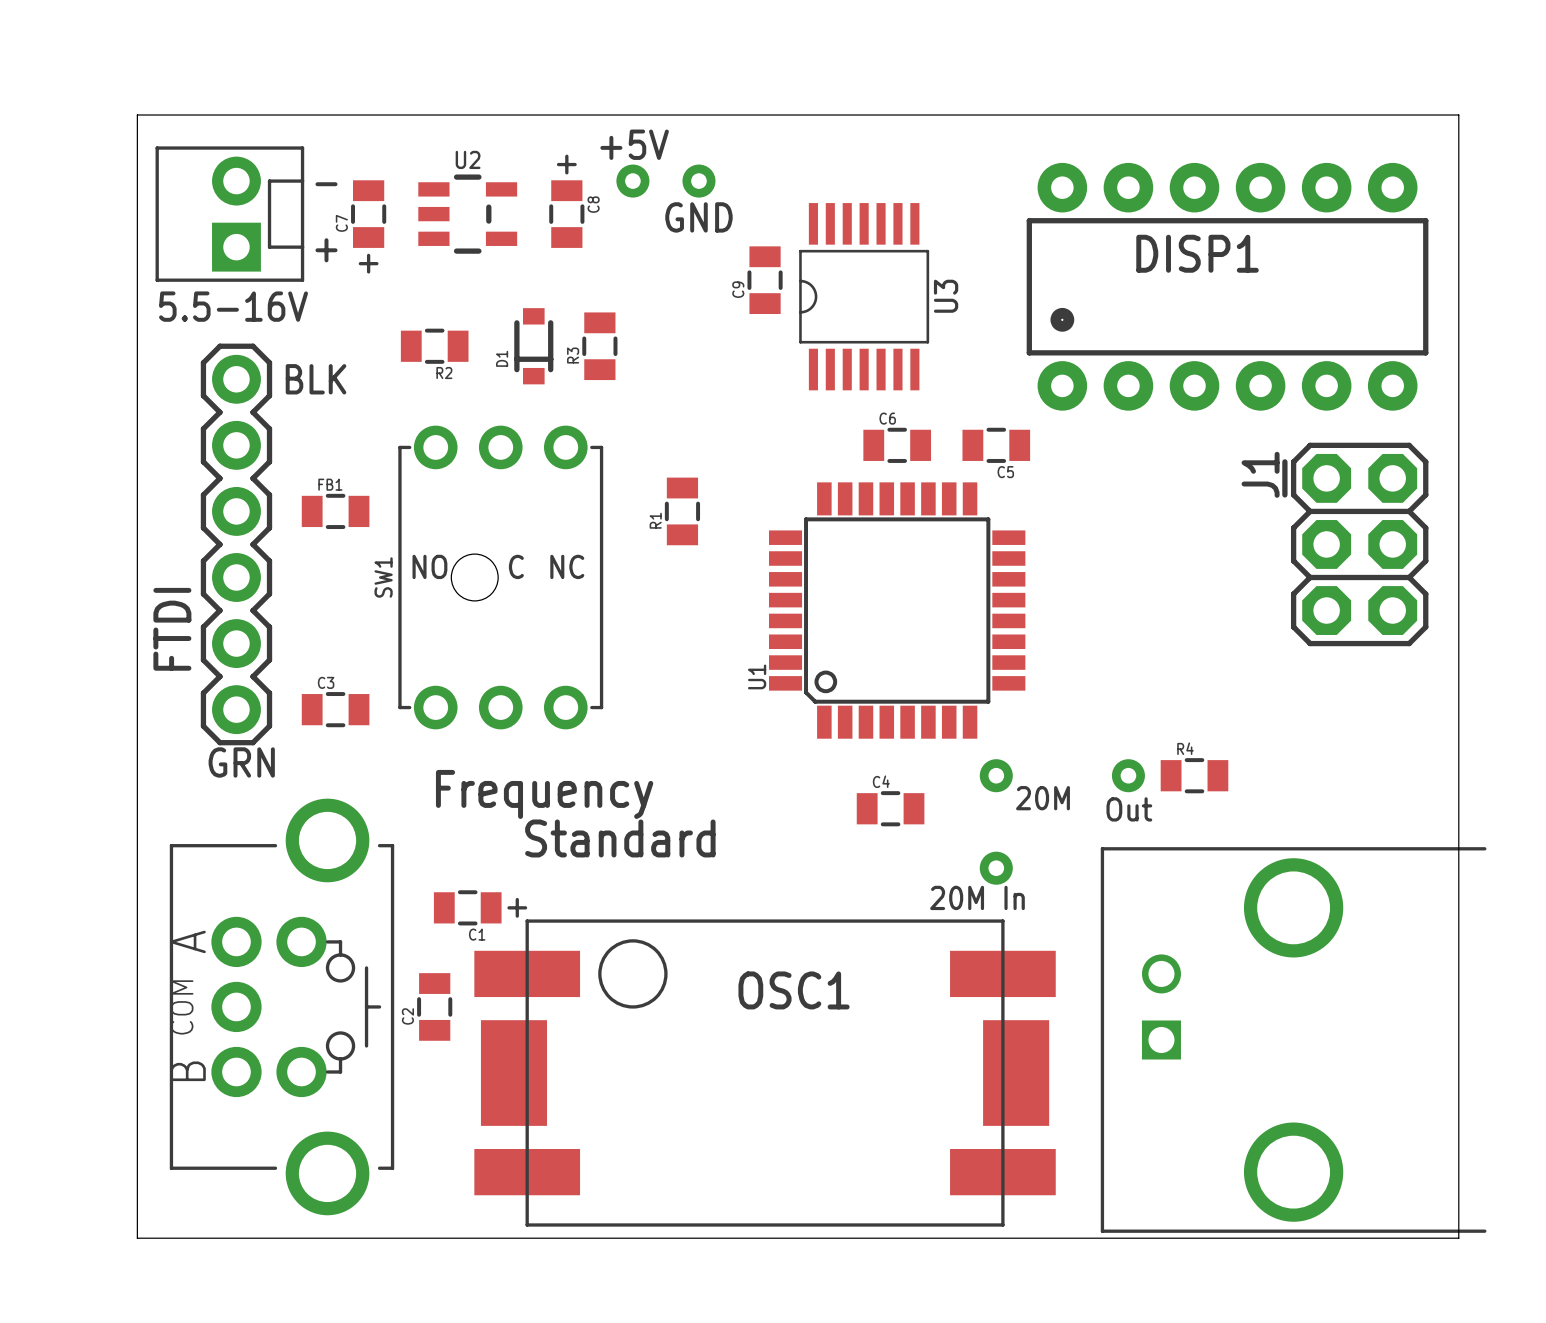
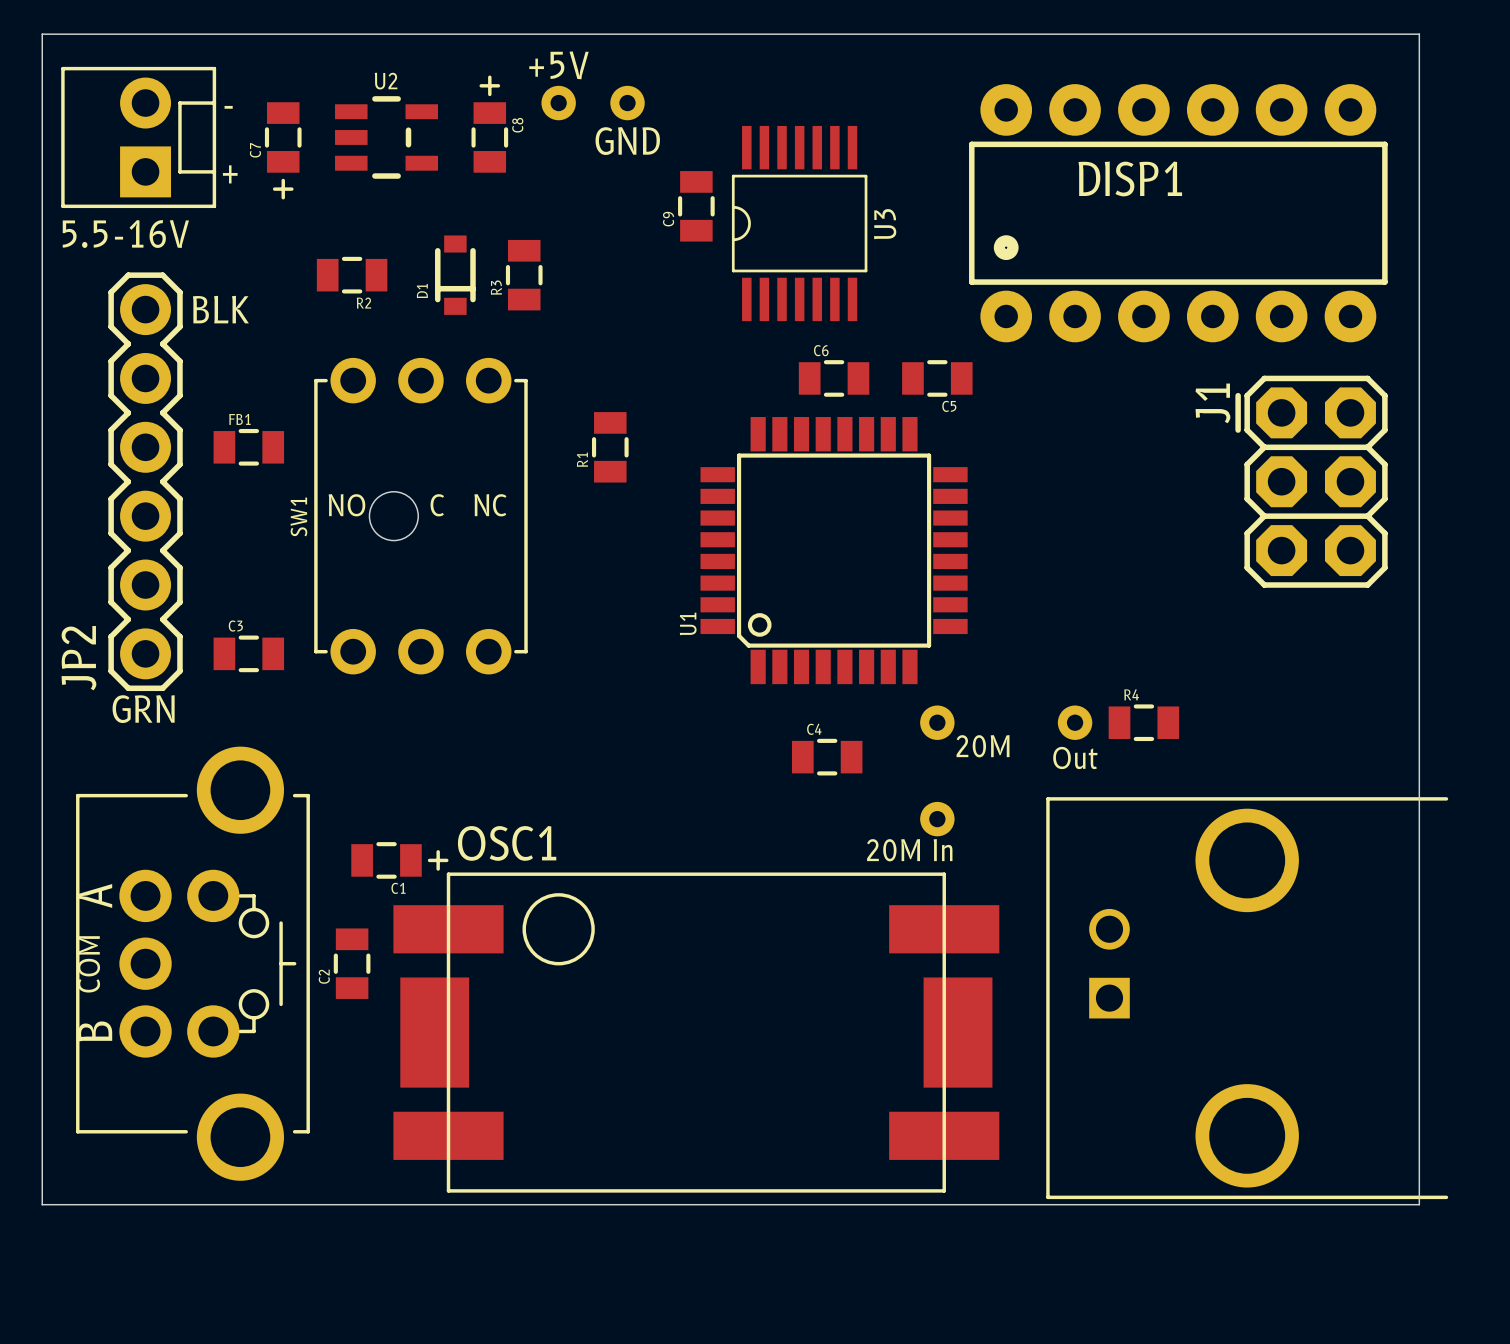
FTDI name: FTDI (172, 629) -> JP2 (78, 658)
text: Frequency (544, 794) -> none
text: Standard (620, 838) -> none
OSC1 name position: OSC1 (794, 990) -> OSC1 (507, 843)

